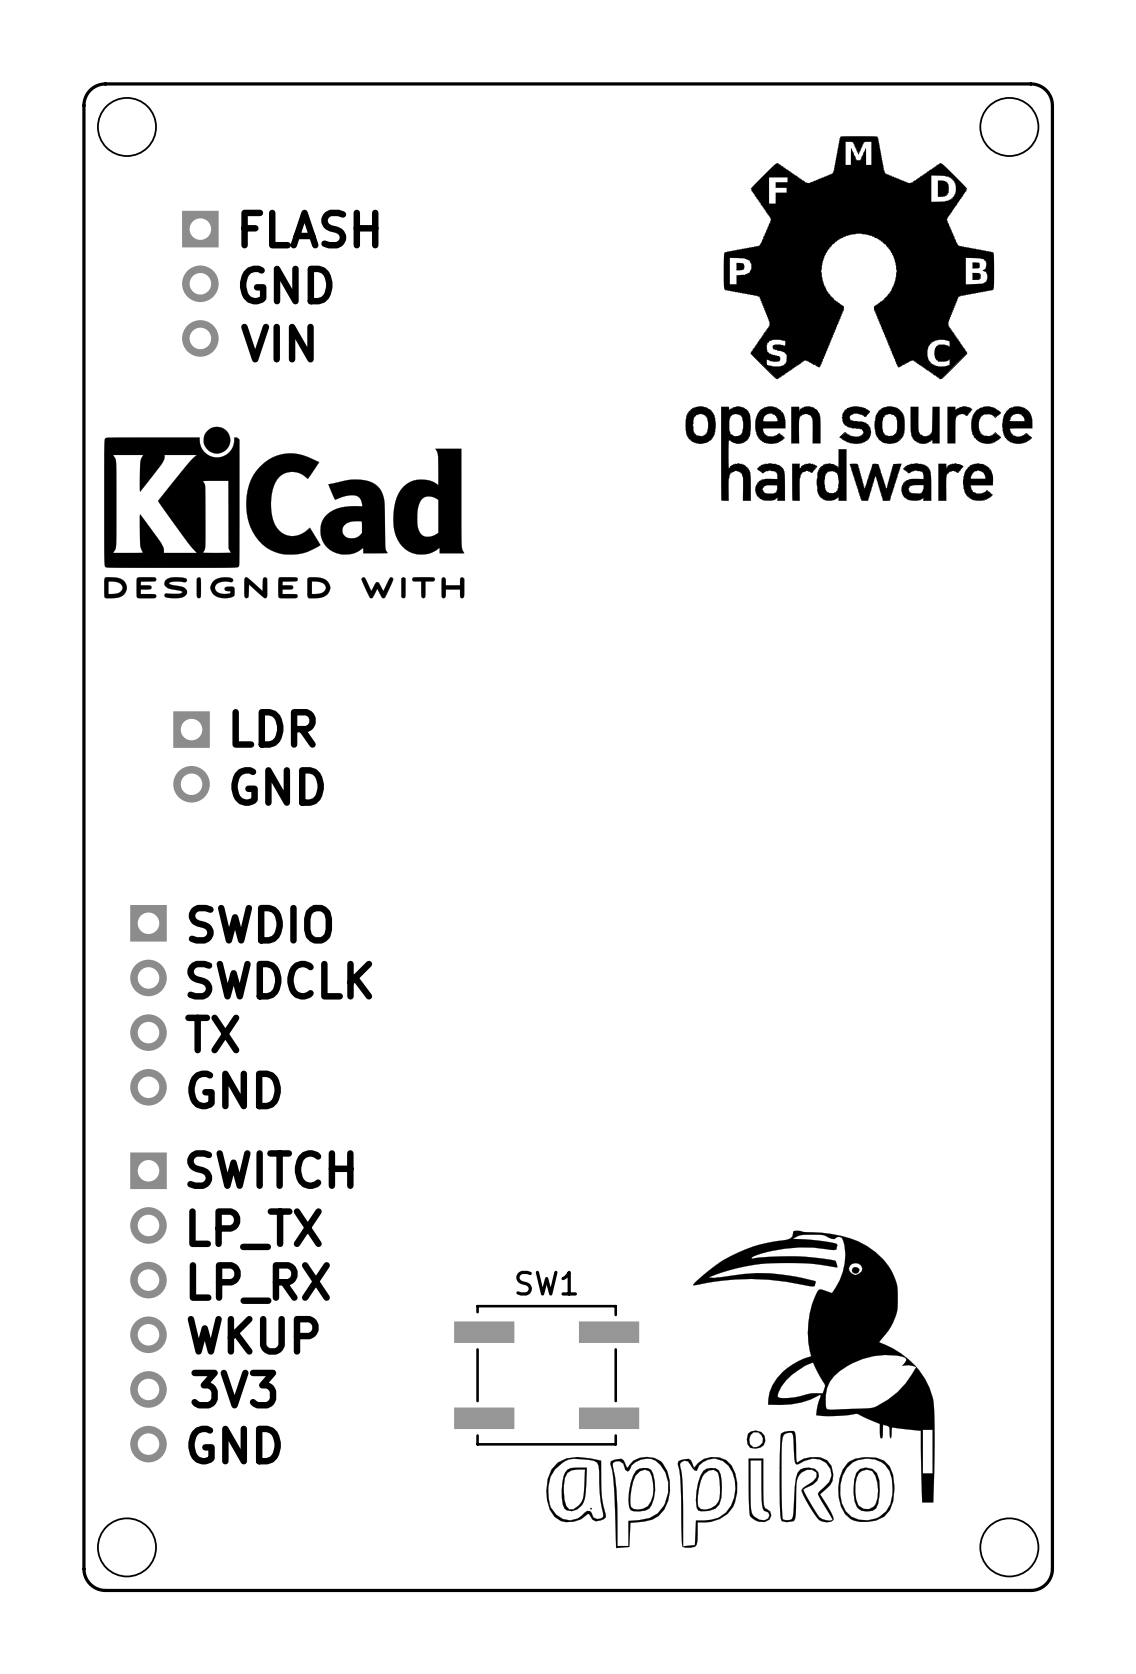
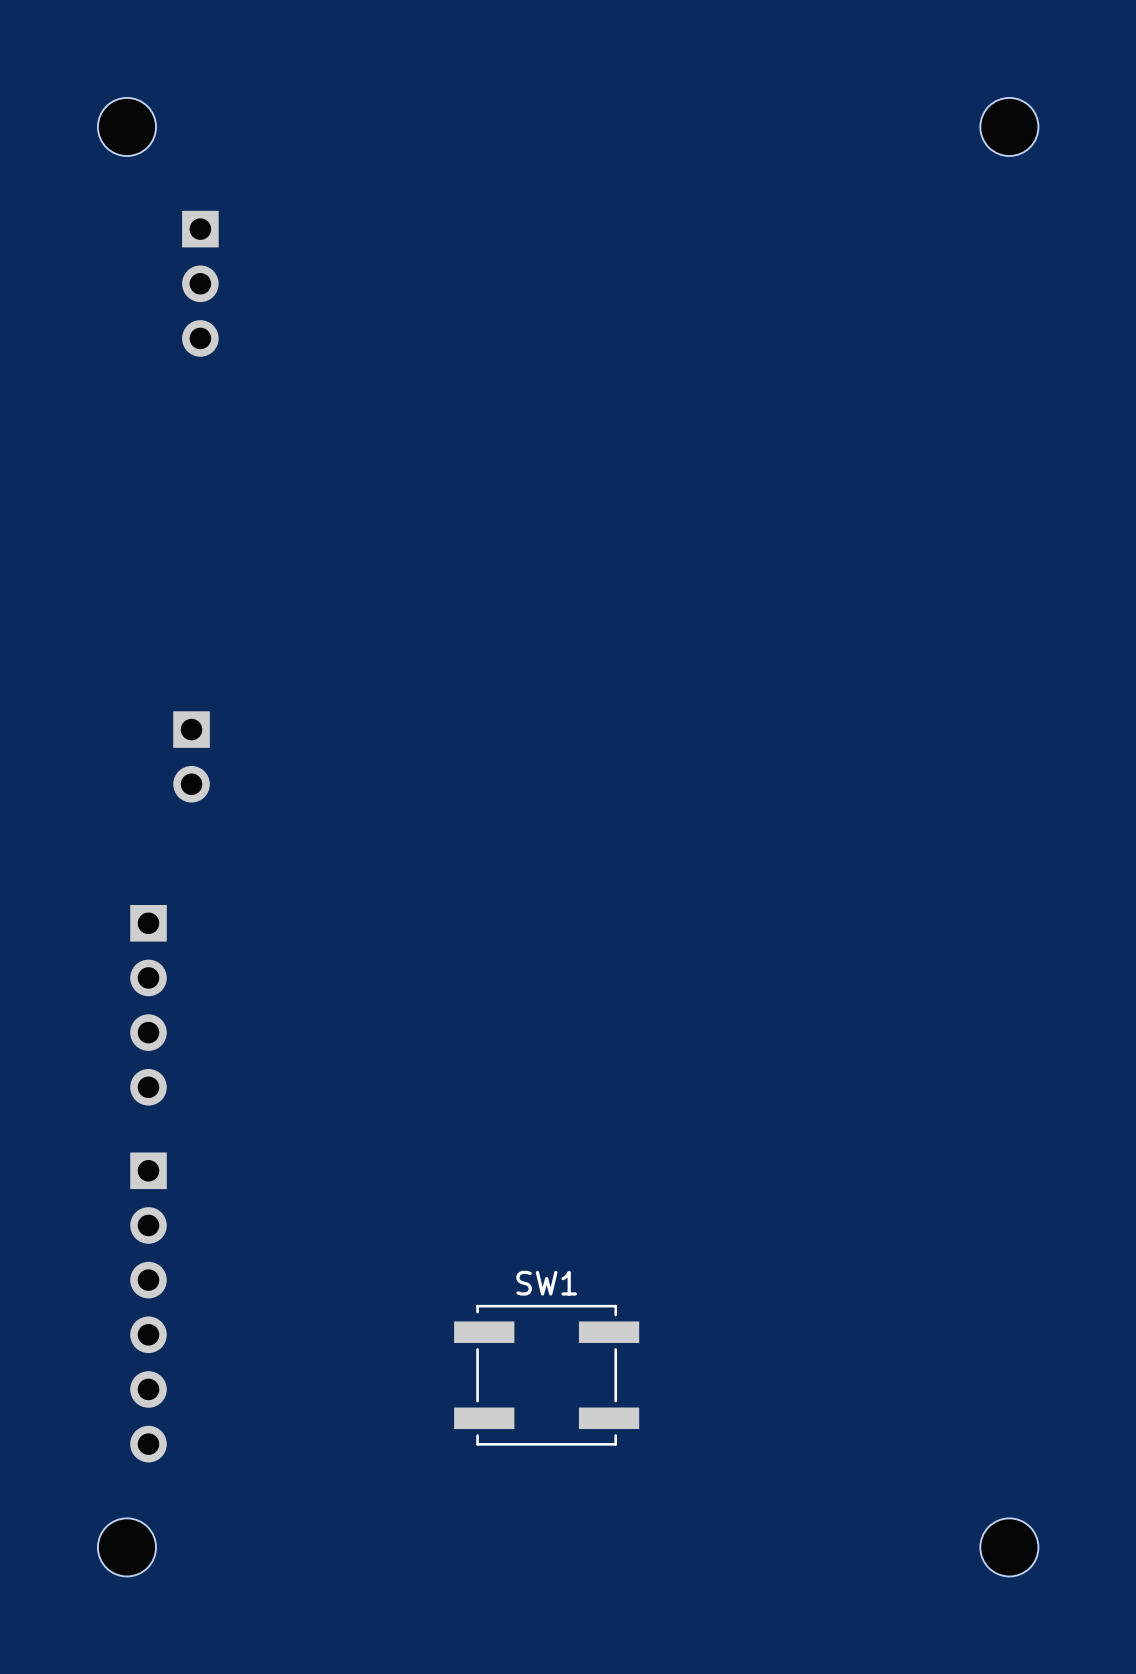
board edge: (1030, 83) (105, 83) (94, 86) (86, 94) (83, 105) (83, 1568) (86, 1579) (94, 1587) (105, 1590) (1030, 1590) (1041, 1587) (1049, 1579) (1052, 1568) (1052, 105) (1050, 97) (1046, 90) (1039, 85) (1030, 83) -> none
drawing: [685, 136, 1033, 501] -> none
text: FLASH (309, 229) -> none
text: GND (286, 285) -> none
text: VIN (277, 343) -> none
drawing: [104, 426, 465, 599] -> none
text: LDR (274, 728) -> none
text: GND (277, 786) -> none
text: SWDIO (260, 924) -> none
text: SWDCLK (279, 980) -> none
text: TX (212, 1033) -> none
text: GND (234, 1089) -> none
text: SWITCH (270, 1169) -> none
text: LP_TX (255, 1229) -> none
drawing: [546, 1230, 935, 1549] -> none
text: LP_RX (259, 1283) -> none
text: WKUP (253, 1335) -> none
text: 3V3 (233, 1389) -> none
text: GND (234, 1445) -> none

